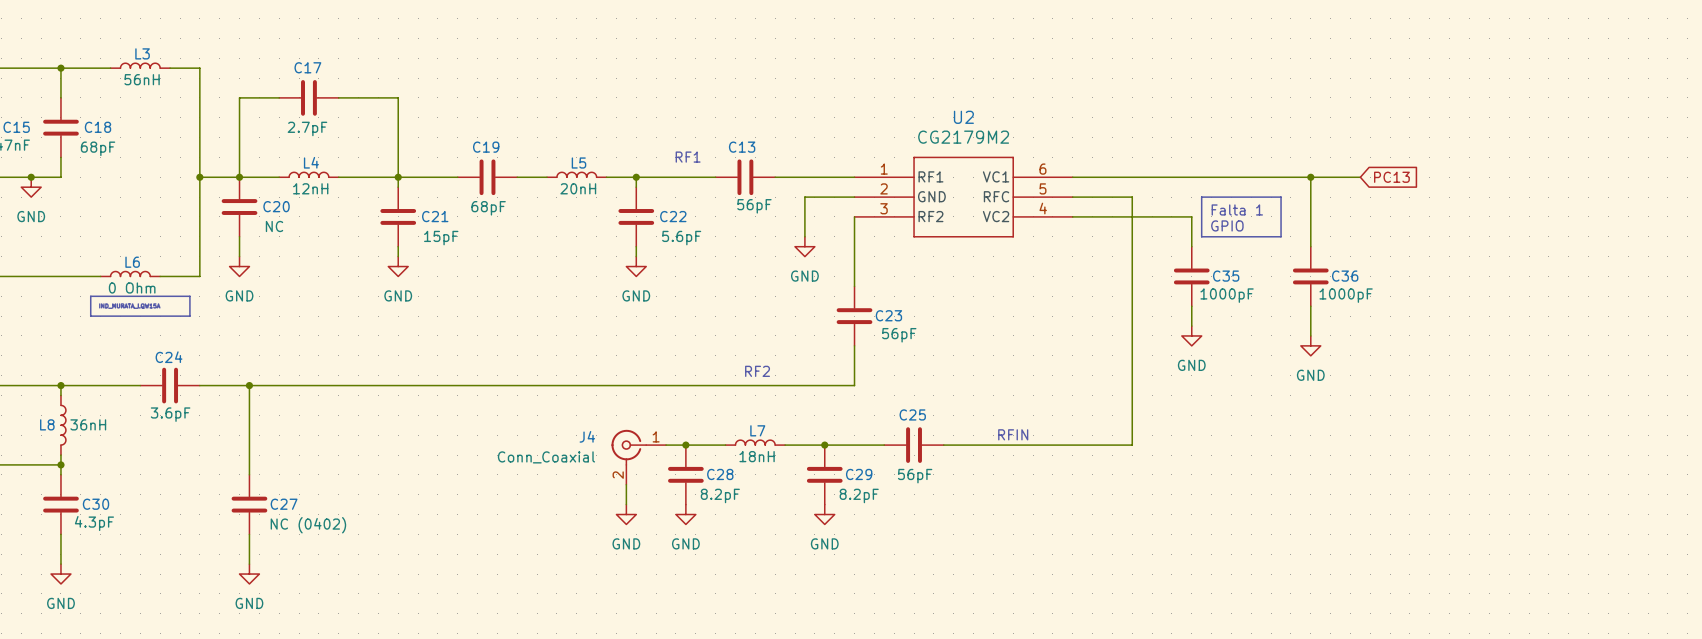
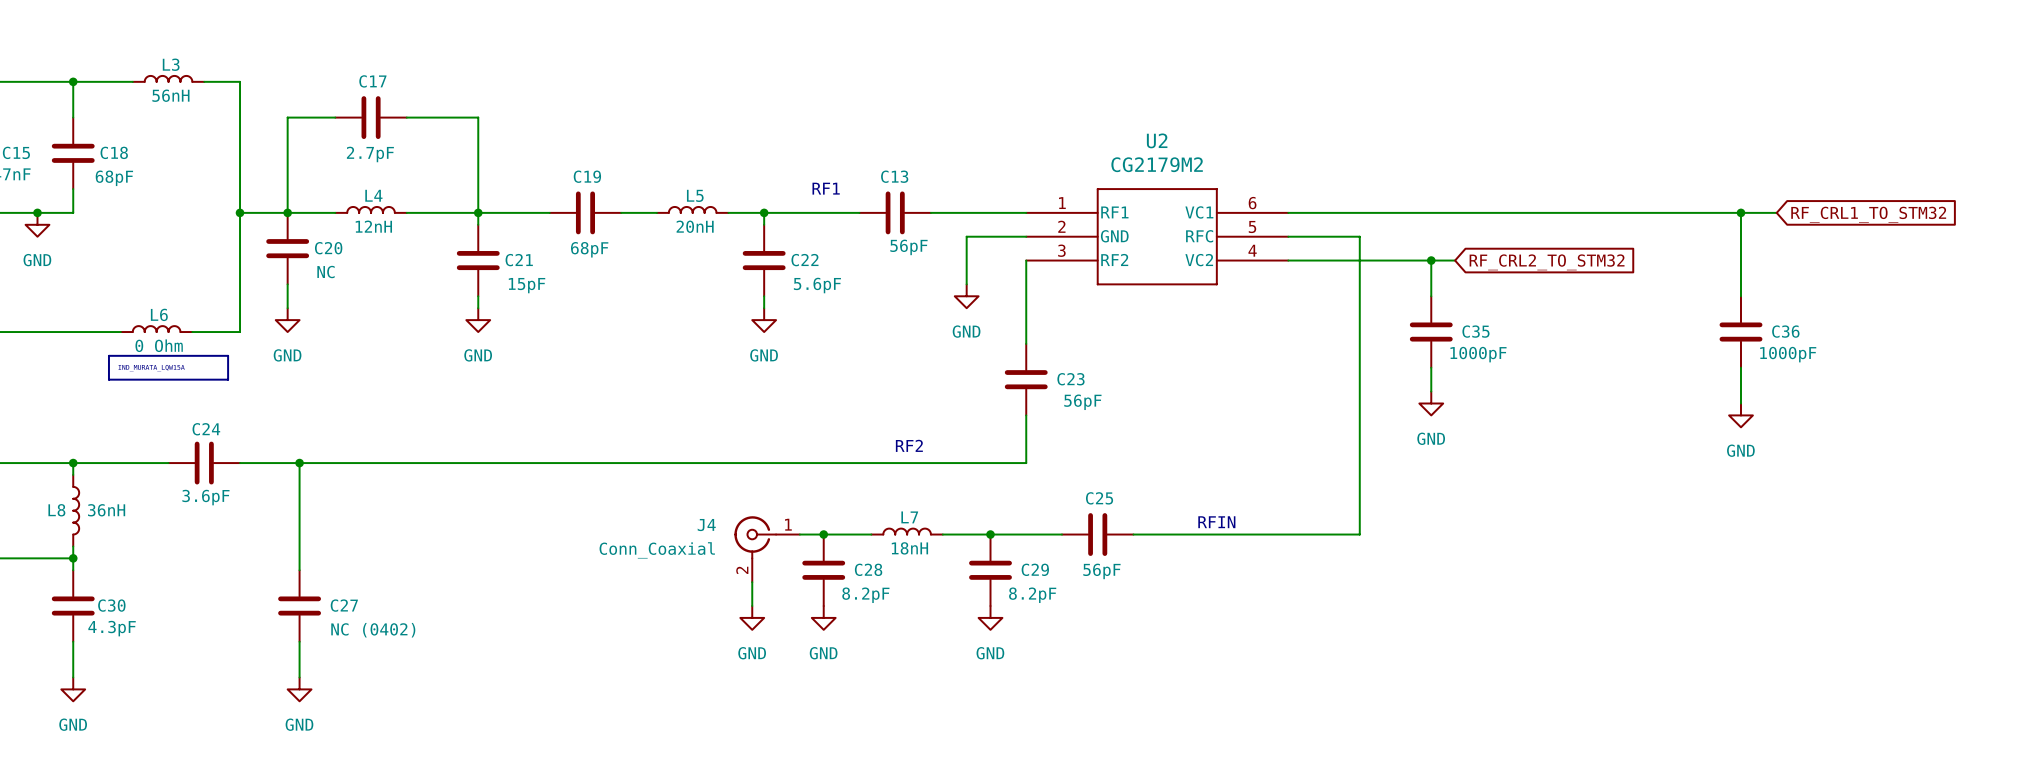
wire: (1310, 177) (1310, 246) -> (1740, 212) (1740, 296)
junction: (1310, 177) -> none
wire: none -> (1633, 212) (1776, 212)
global label: PC13 (1391, 177) -> none
junction: none -> (1740, 212)
global label: none -> RF_CRL1_TO_STM32 (1868, 214)
line: (1201, 197) (1281, 197) (1281, 236) (1201, 236) (1201, 197) -> none
text: Falta 1 (1237, 209) -> none
wire: none -> (1431, 260) (1455, 260)
junction: none -> (1431, 260)
global label: none -> RF_CRL2_TO_STM32 (1547, 262)
text: GPIO (1227, 225) -> none
C36 position: (1310, 276) -> (1740, 332)
wire: (1310, 306) (1310, 335) -> (1740, 367) (1740, 403)
power symbol position: GND (1310, 345) -> GND (1740, 415)

